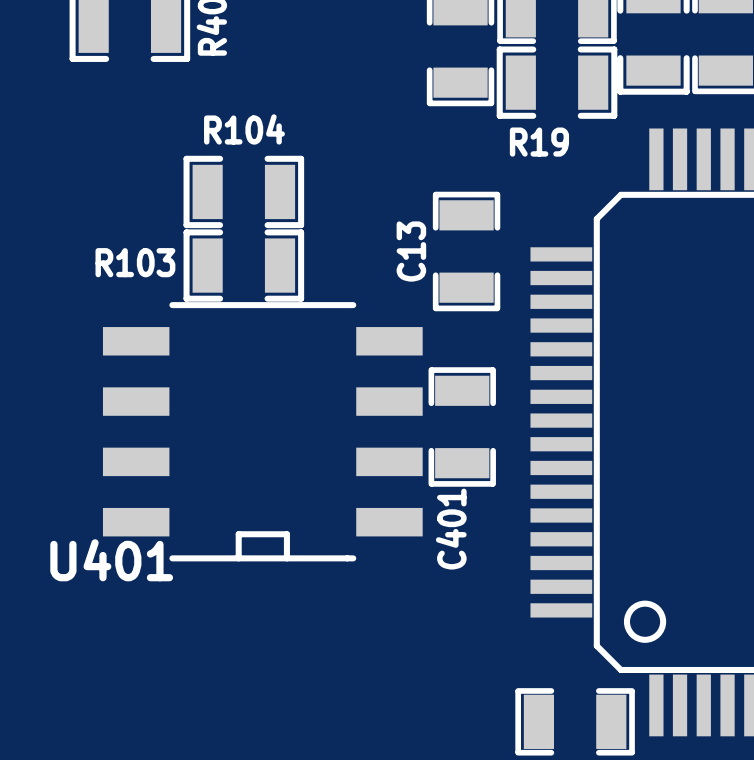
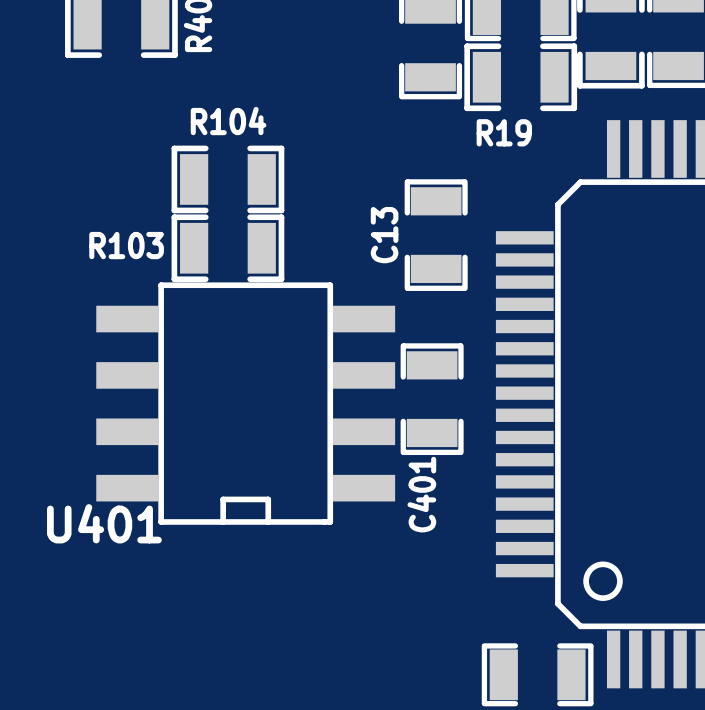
U401 footprint: [102, 302, 423, 562] -> [96, 282, 396, 525]

